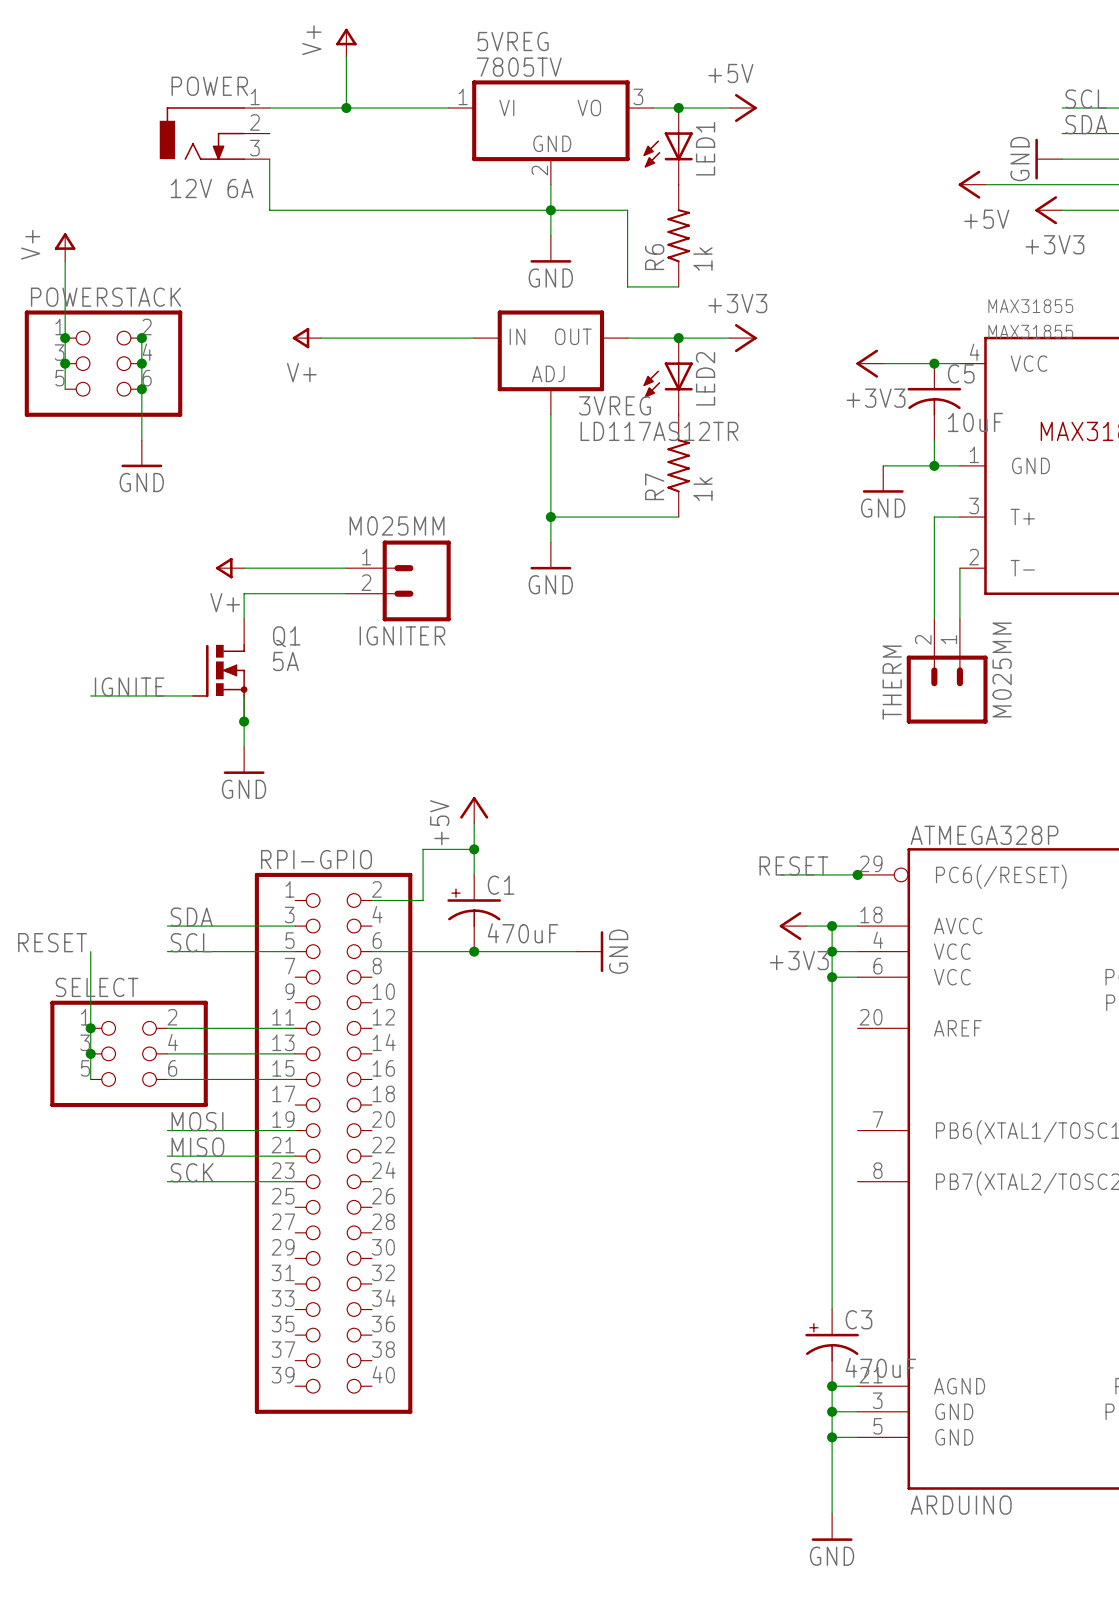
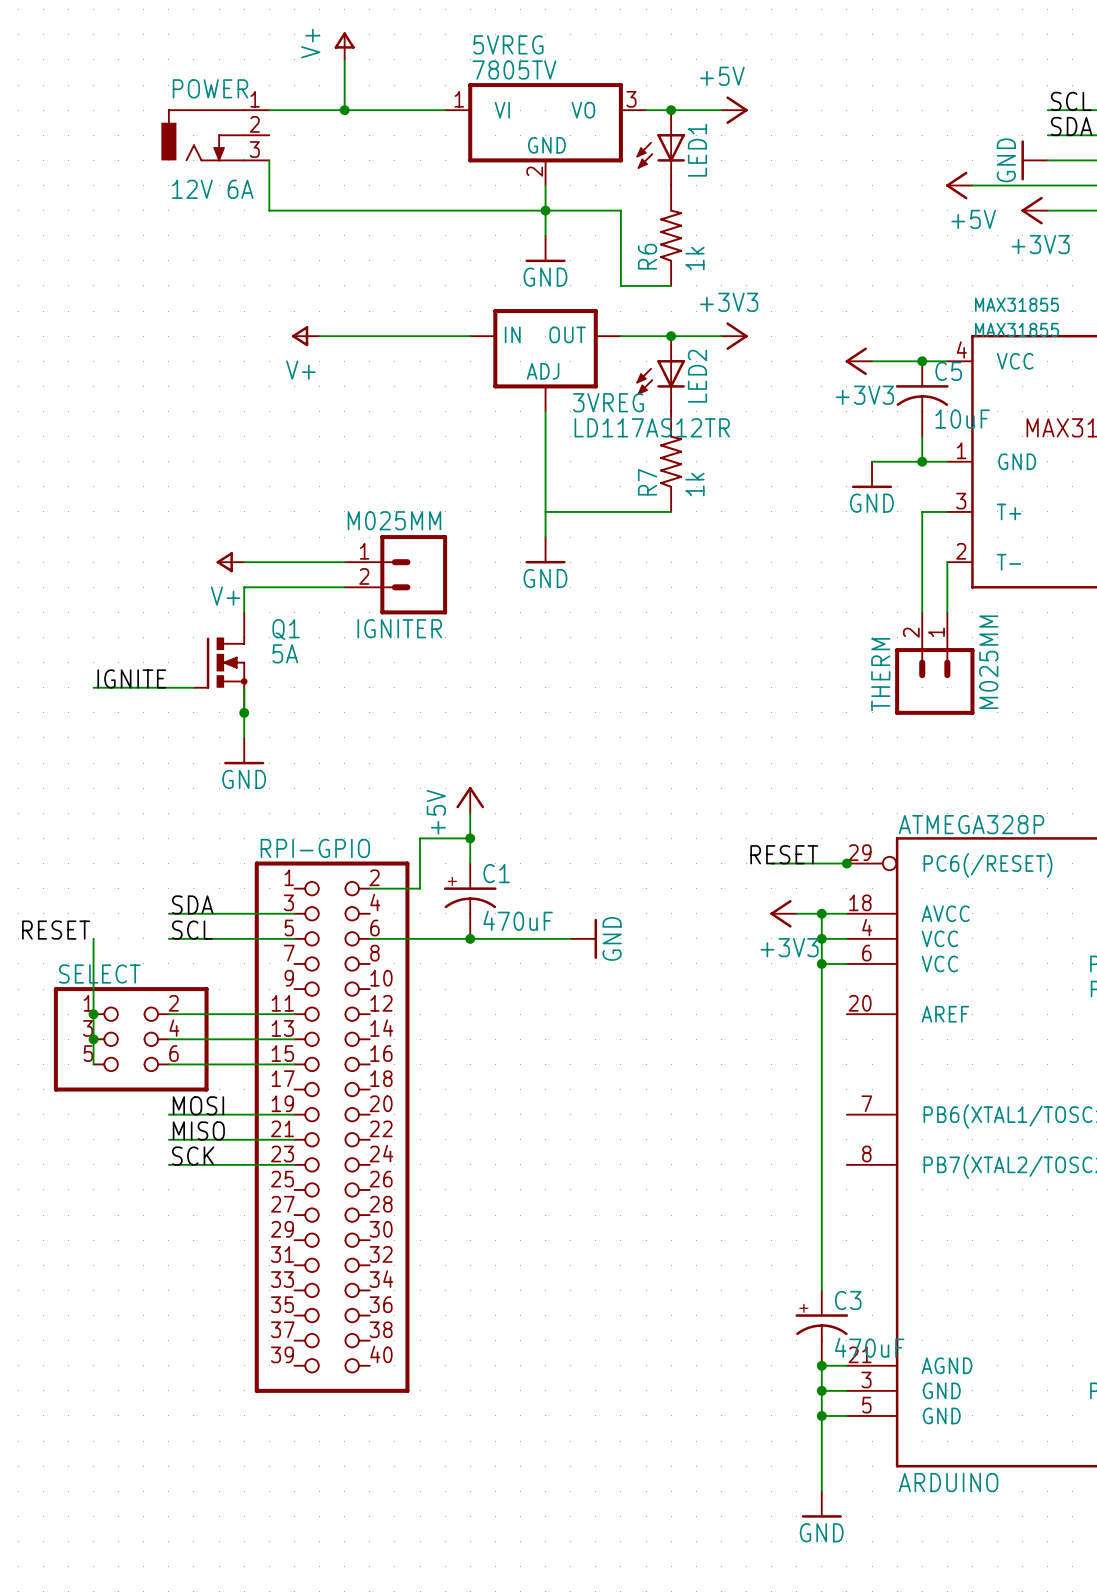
power symbol: V+ (65, 247) -> none
wire: (65, 261) (65, 389) -> none
junction: (65, 338) -> none
wire: (141, 338) (141, 440) -> none
junction: (141, 338) -> none
junction: (65, 363) -> none
POWERSTACK: (103, 363) -> none
junction: (141, 363) -> none
junction: (141, 389) -> none
power symbol: GND (141, 453) -> none
junction: (550, 517) -> none

